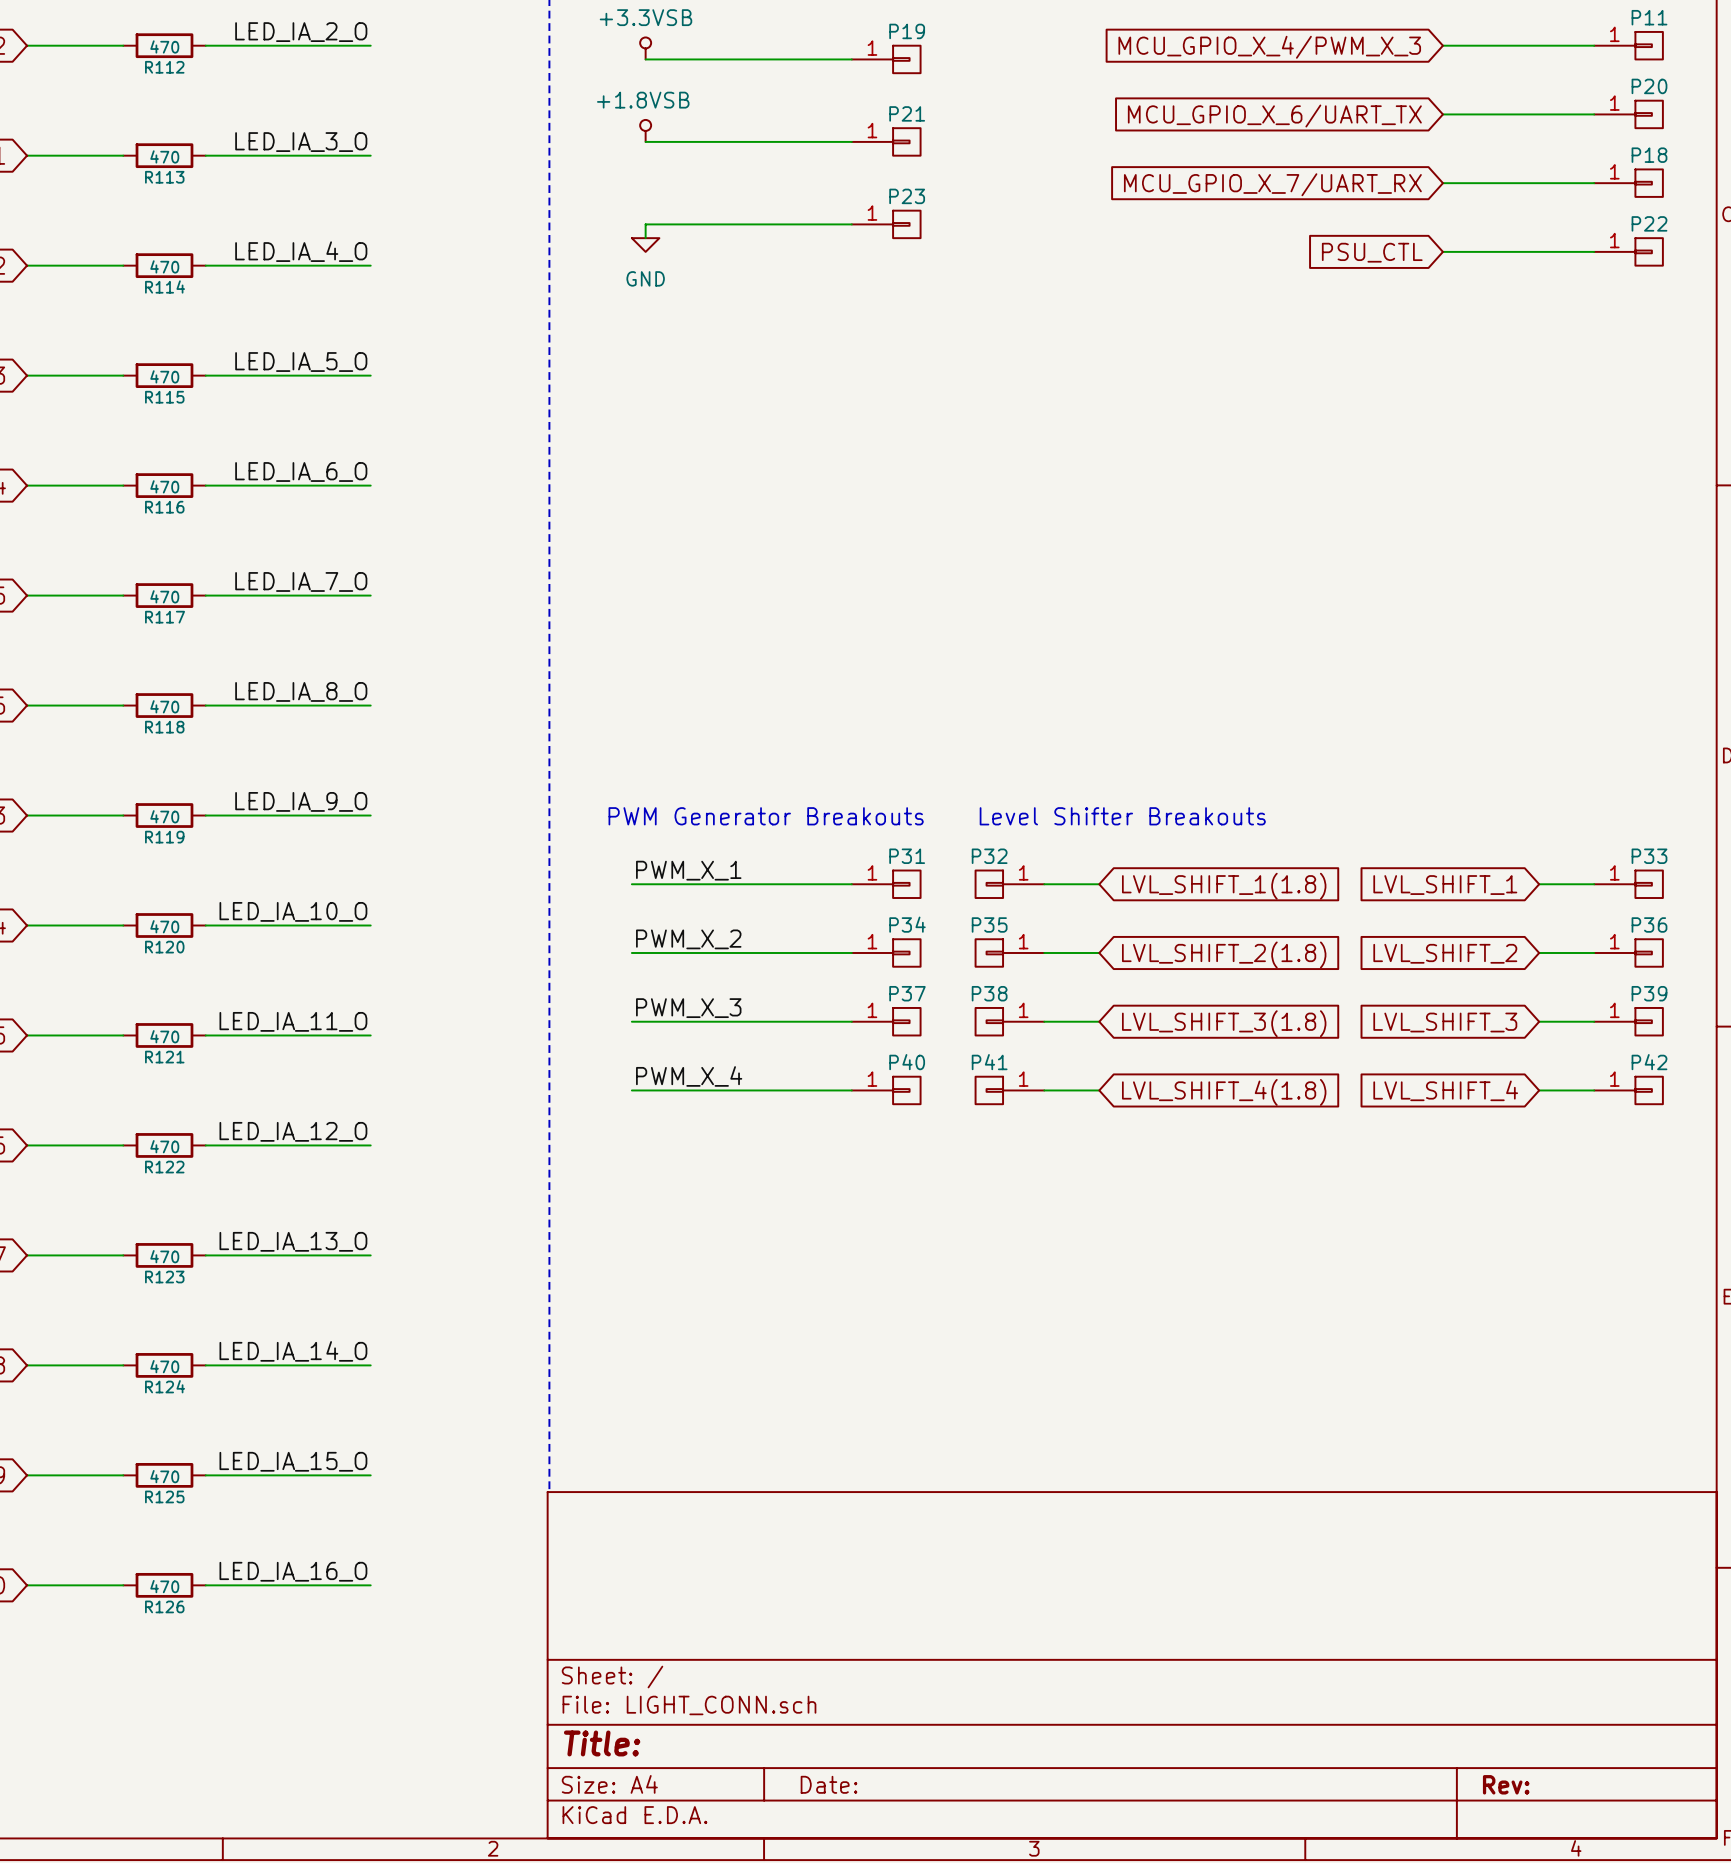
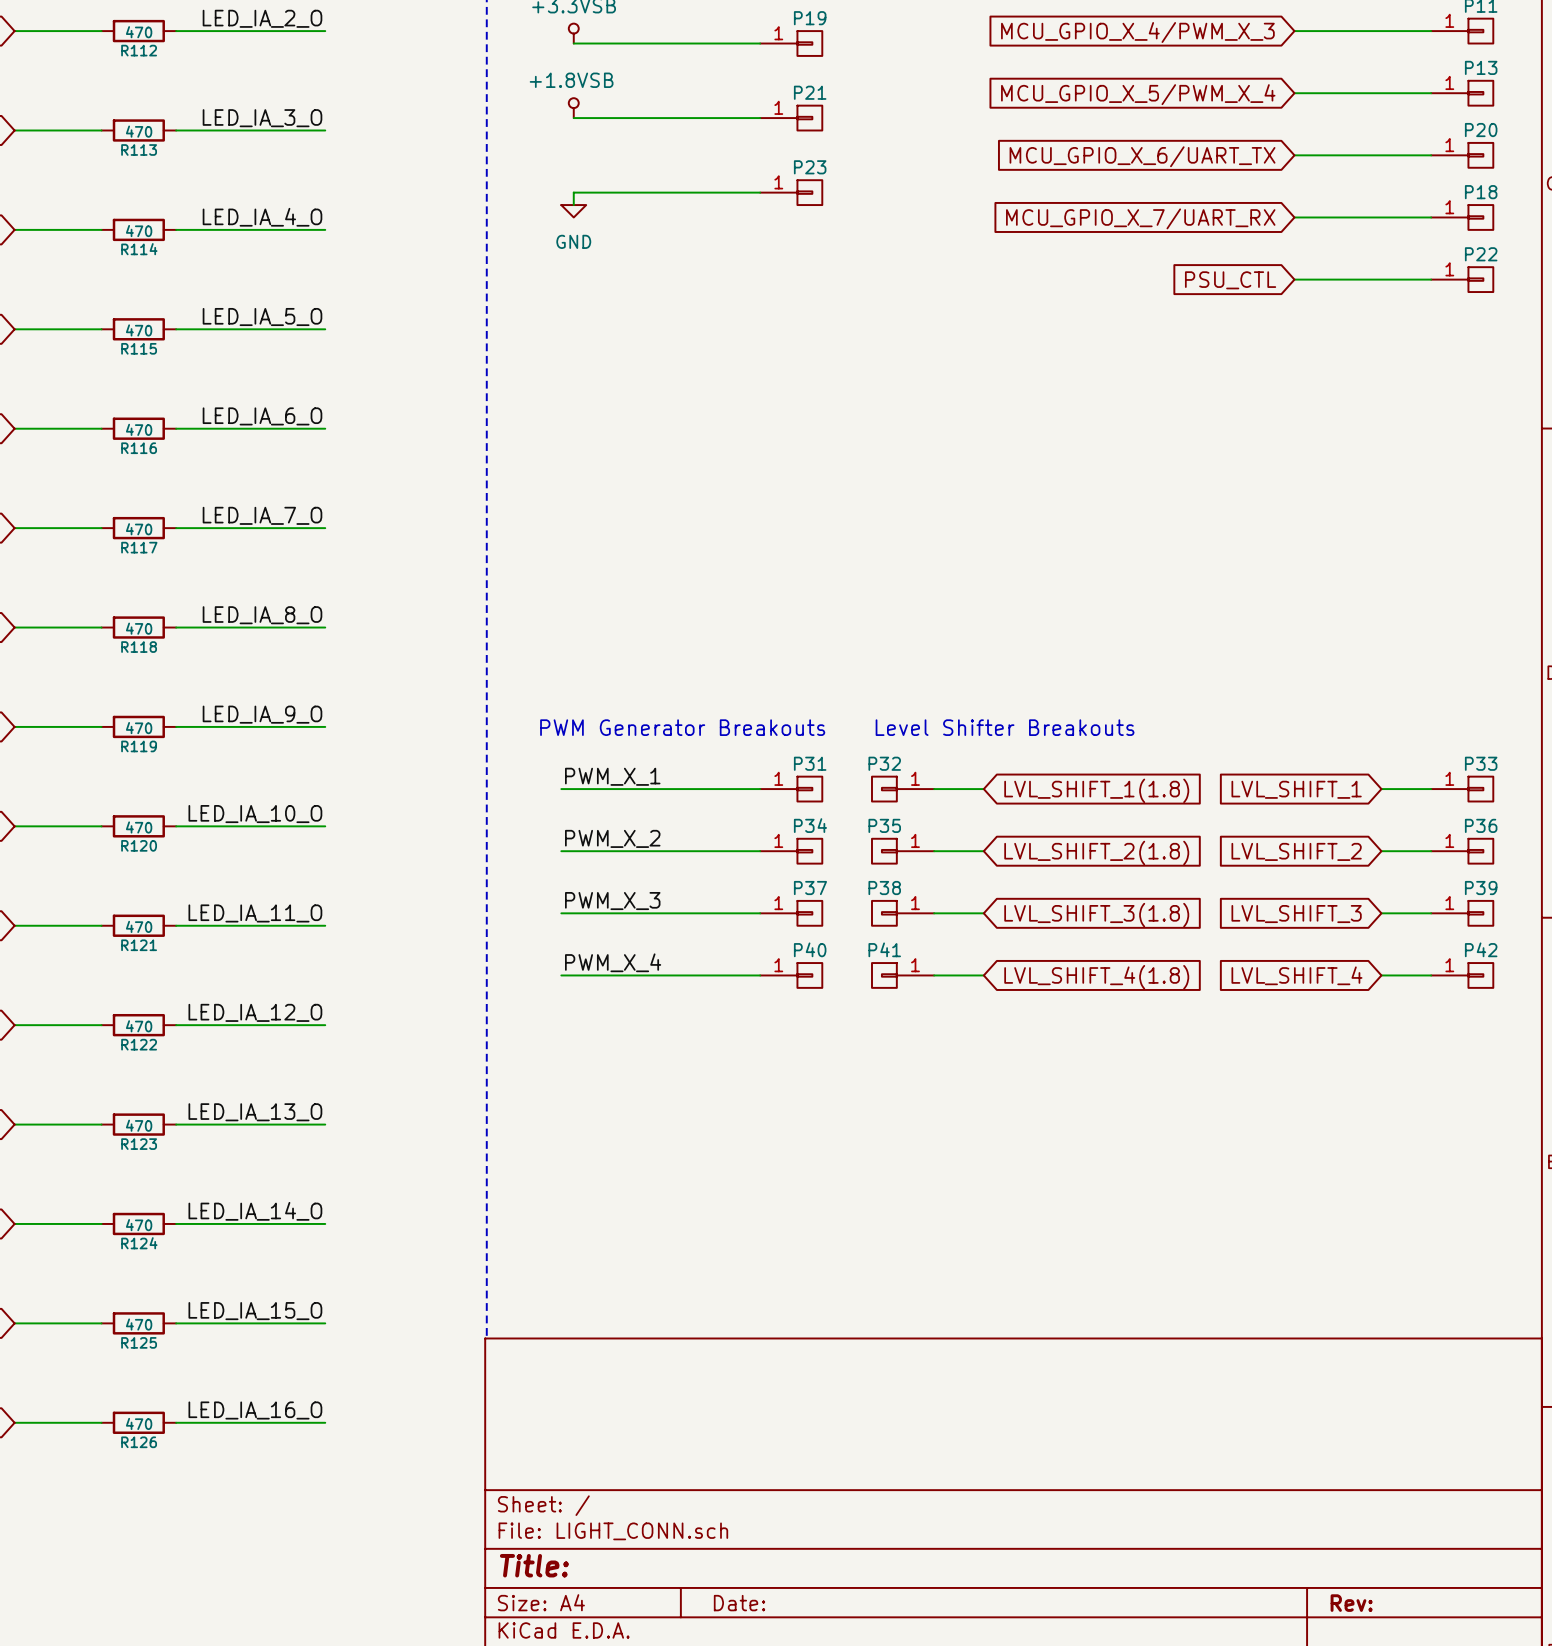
P20 name: P20 (1649, 86) -> P13 (1481, 67)
global label: MCU_GPIO_X_6/UART_TX (1274, 116) -> MCU_GPIO_X_5/PWM_X_4 (1138, 94)
P18 name: P18 (1649, 155) -> P20 (1481, 130)
global label: MCU_GPIO_X_7/UART_RX (1272, 184) -> MCU_GPIO_X_6/UART_TX (1142, 156)
P22 name: P22 (1649, 223) -> P18 (1481, 192)
global label: PSU_CTL (1372, 252) -> MCU_GPIO_X_7/UART_RX (1140, 218)
wire: none -> (1294, 279) (1431, 279)
P22: none -> (1462, 279)
global label: none -> PSU_CTL (1230, 280)

